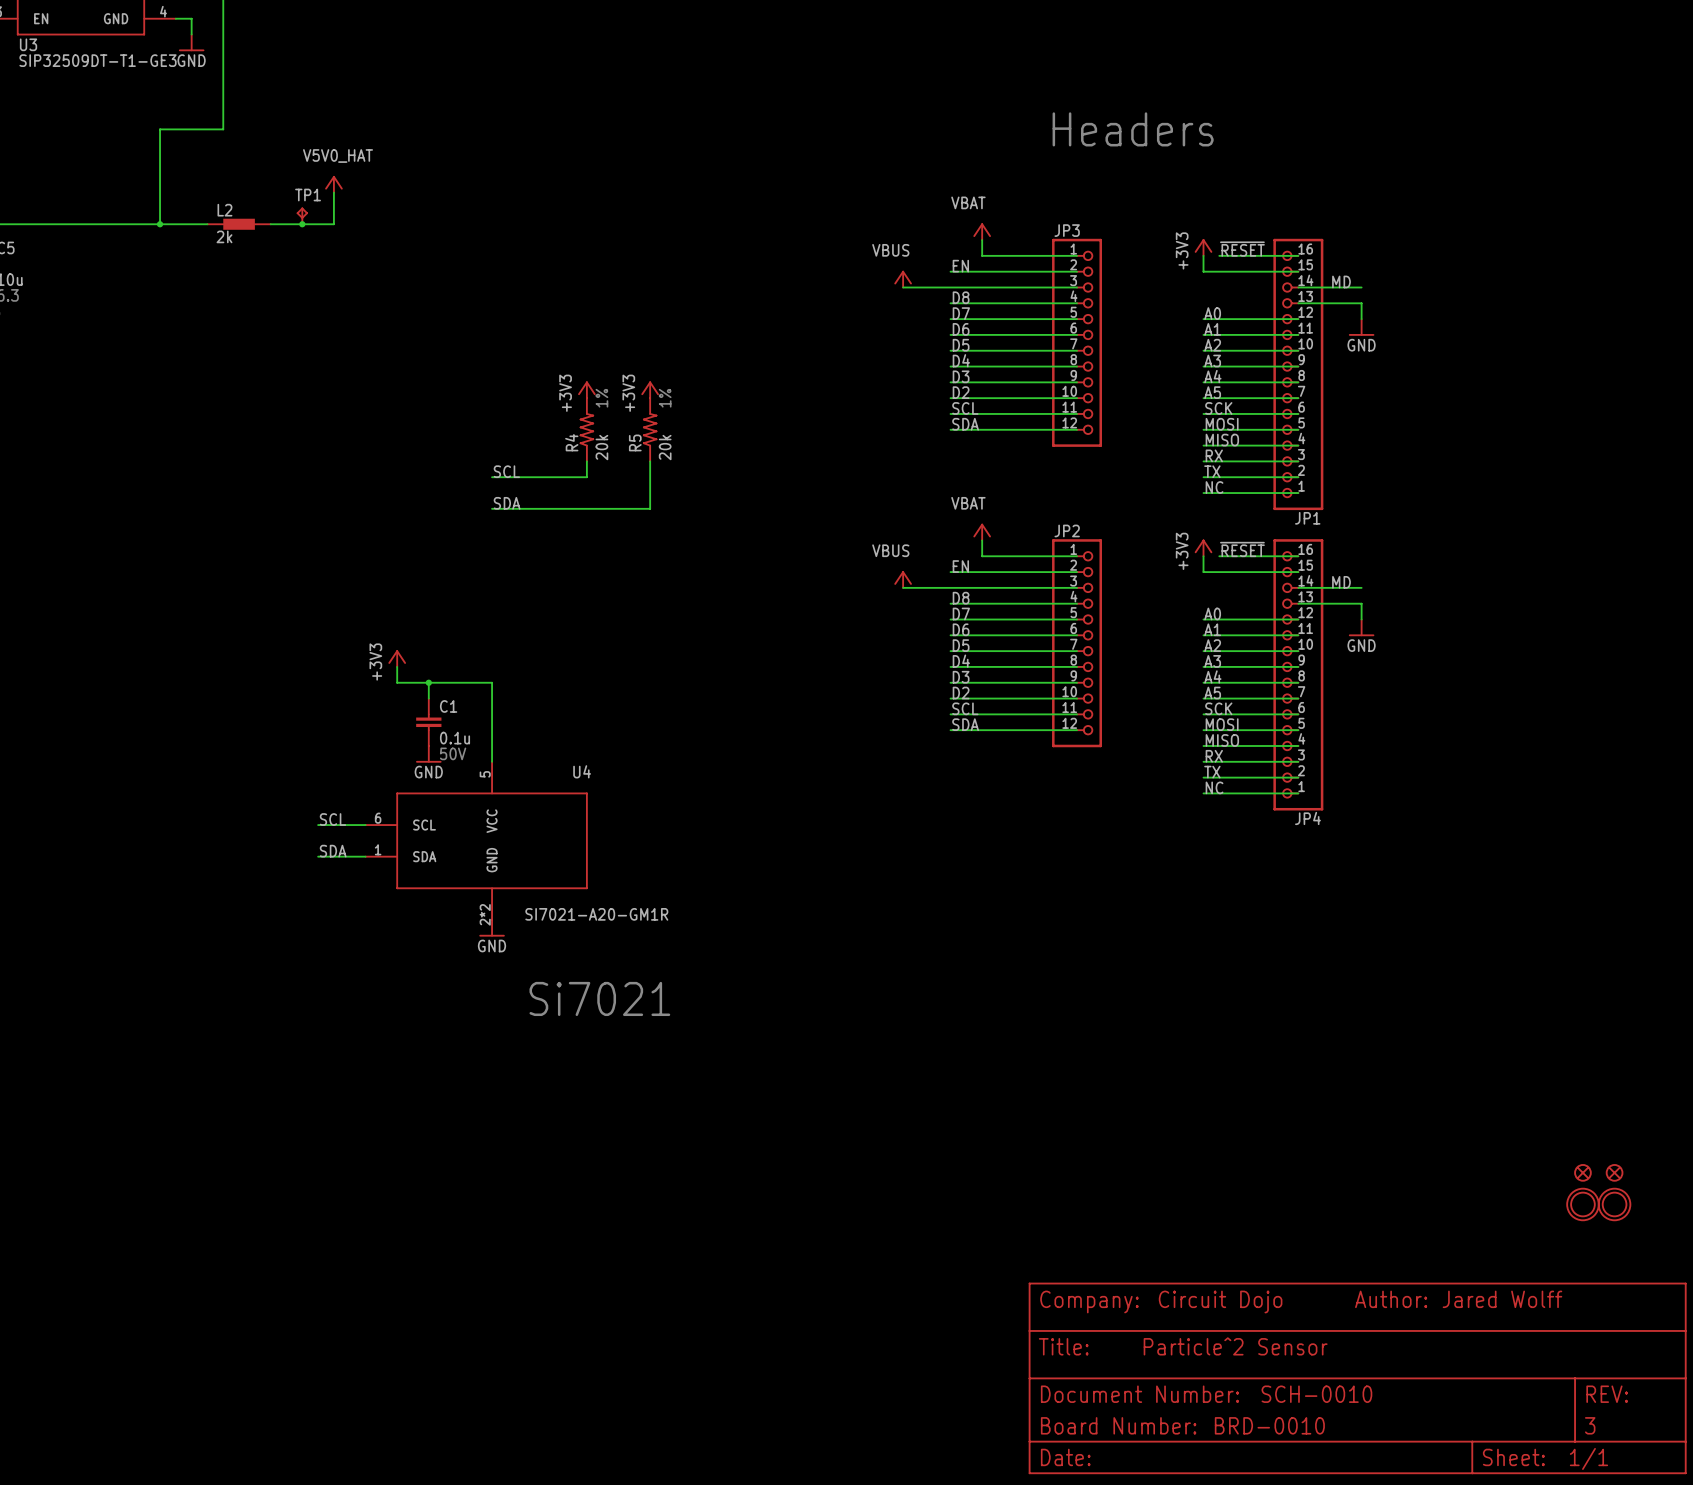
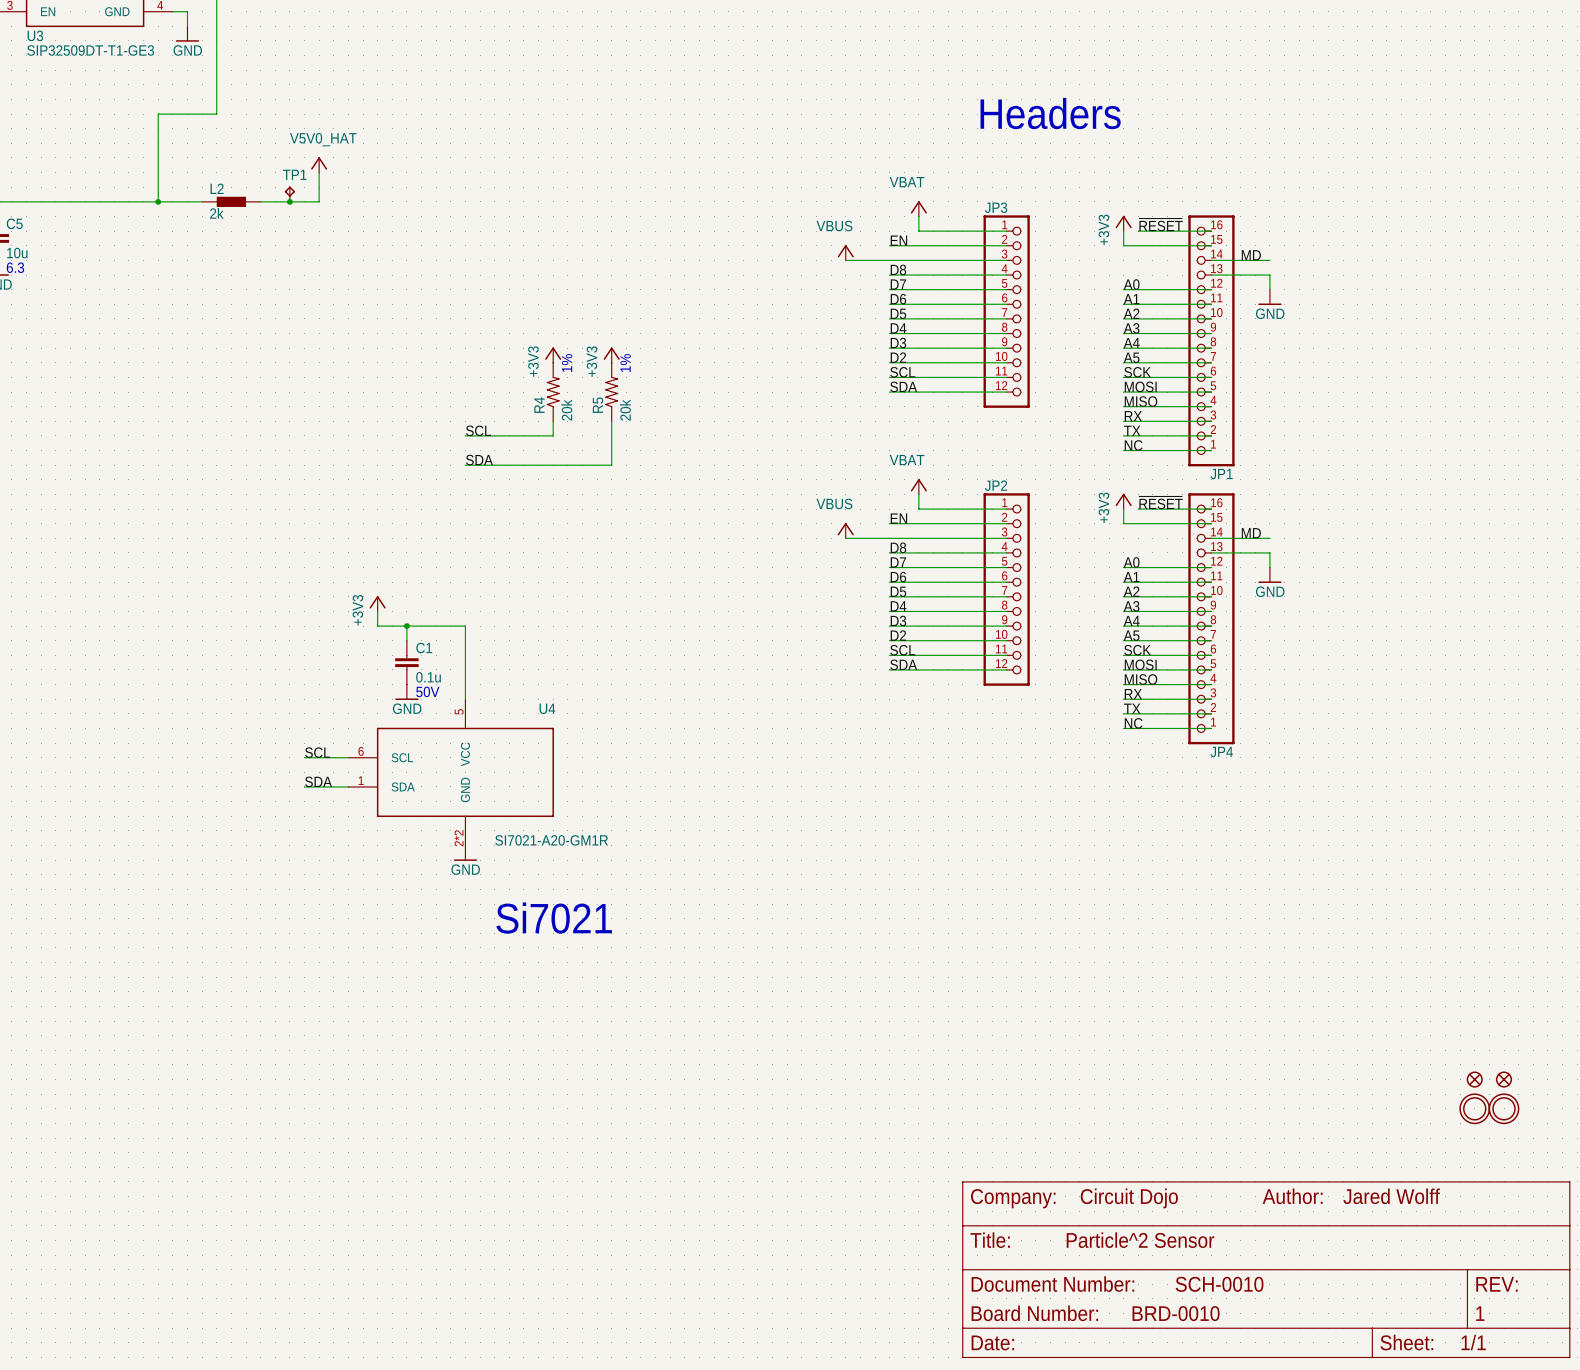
part text: 3 (1590, 1425) -> 1 (1480, 1313)

